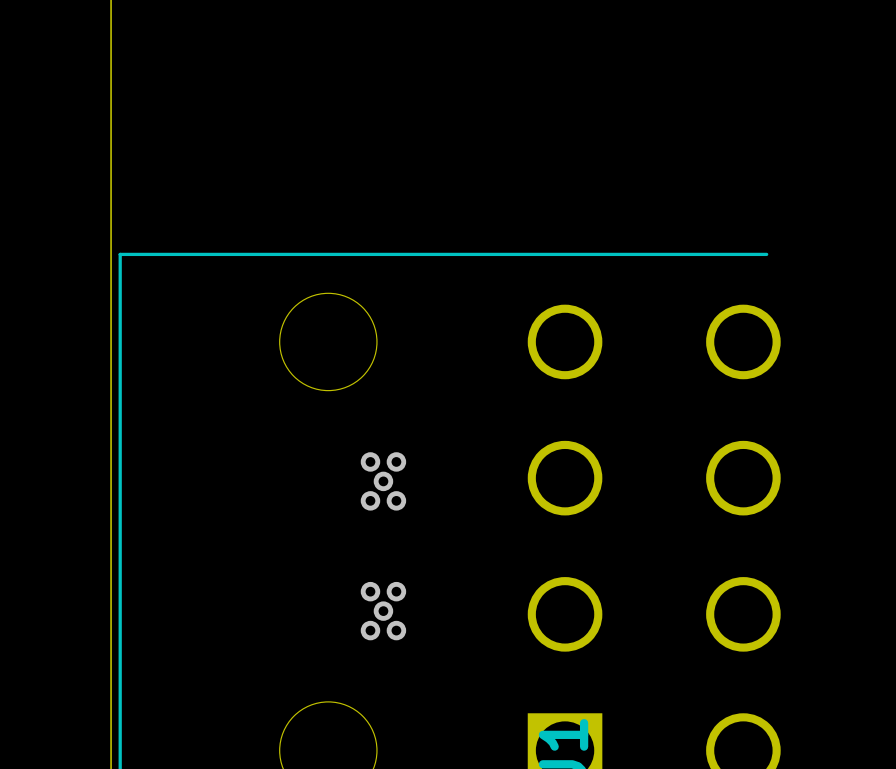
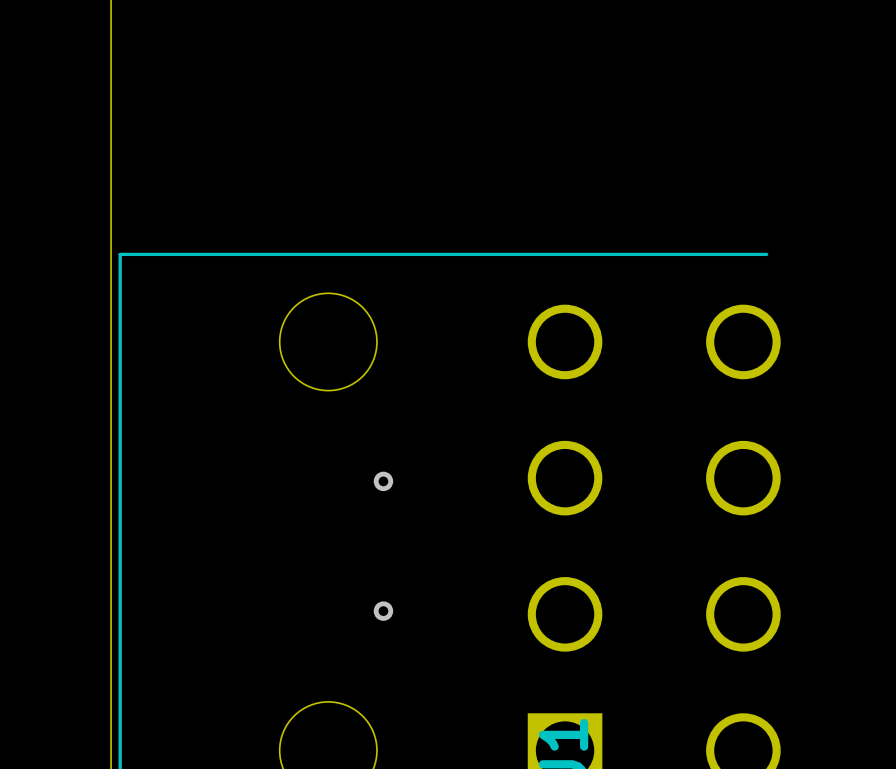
via: (370, 461) -> none
via: (396, 461) -> none
via: (370, 500) -> none
via: (396, 500) -> none
via: (370, 591) -> none
via: (396, 591) -> none
via: (370, 630) -> none
via: (396, 630) -> none

